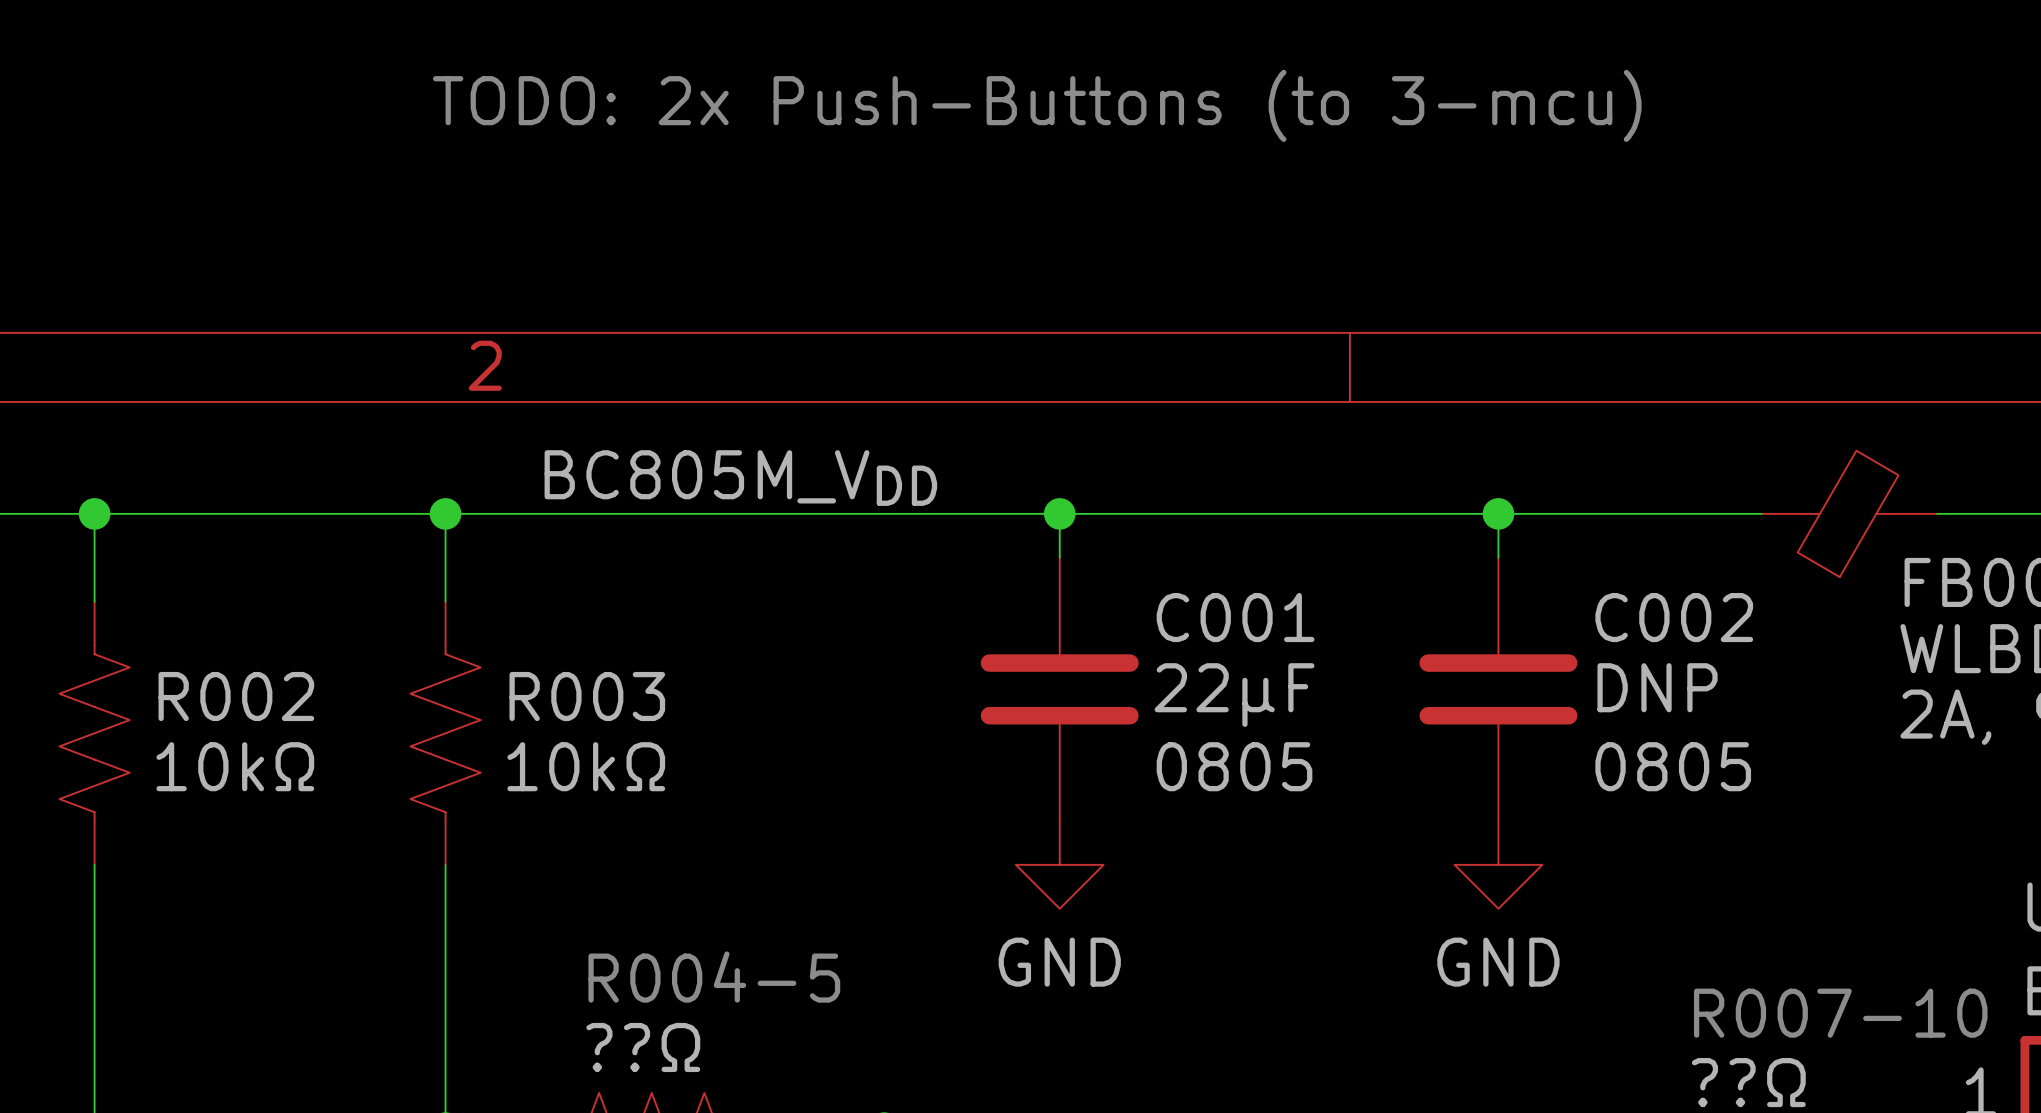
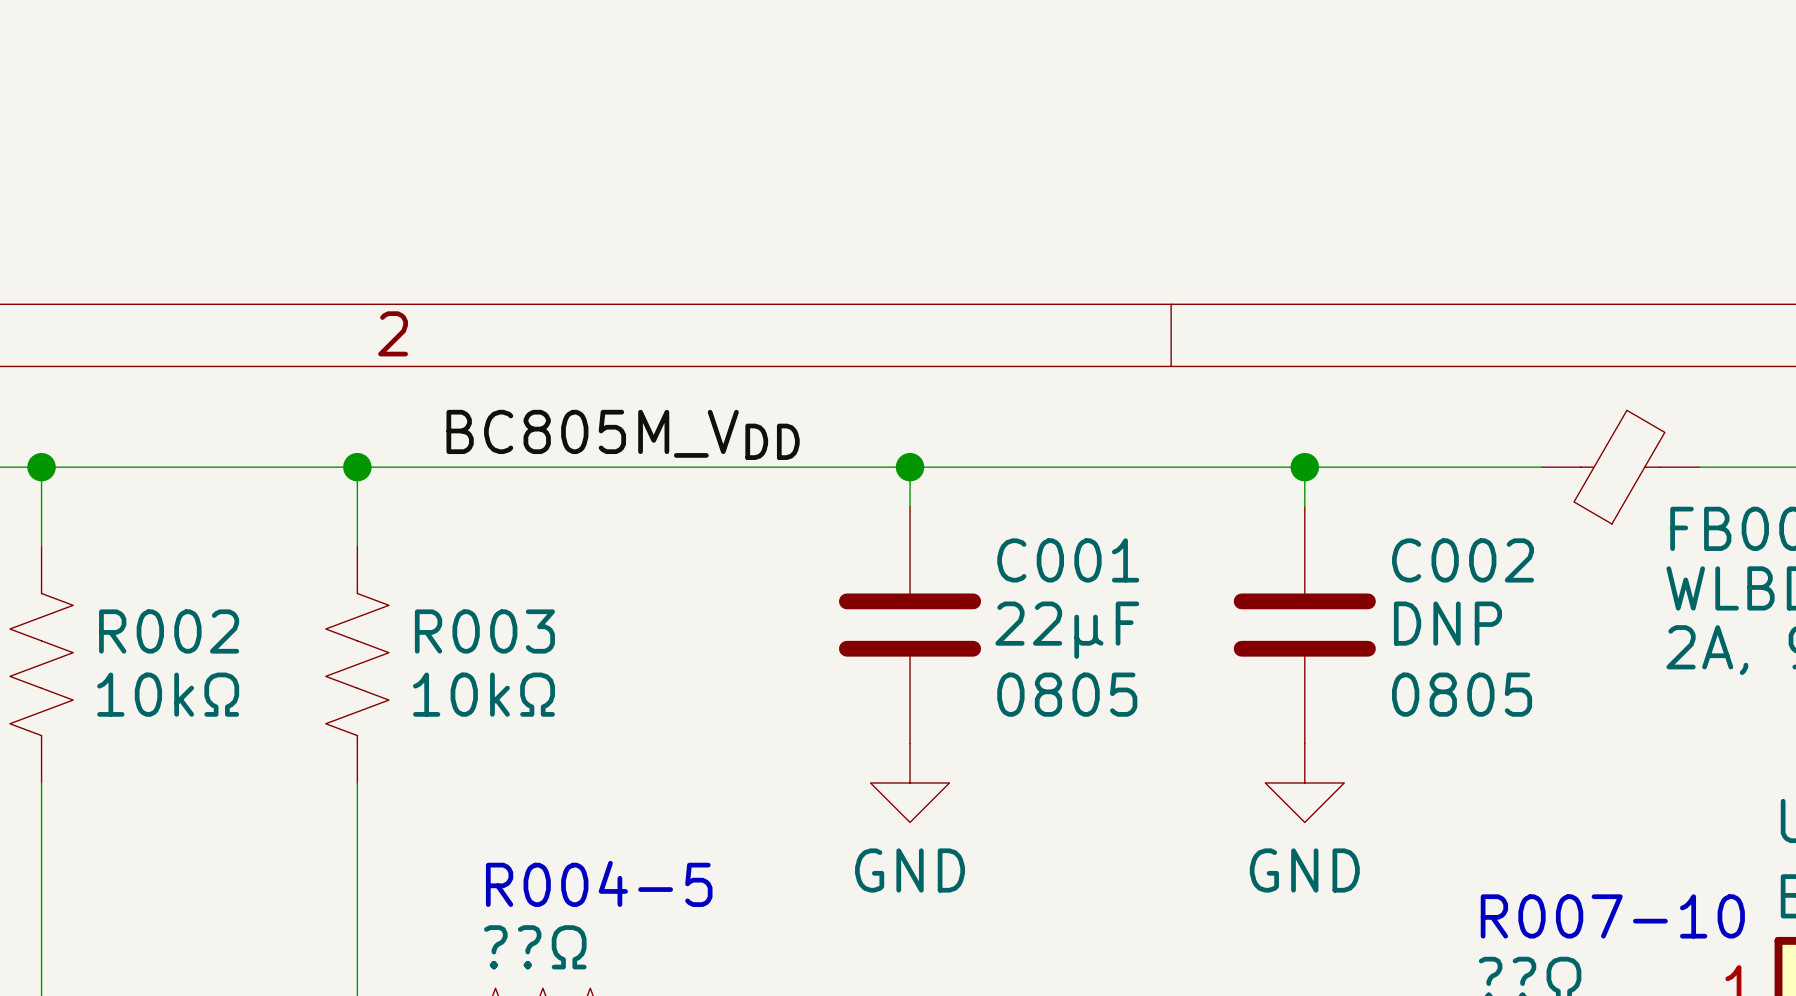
text: TODO: 2x Push-Buttons (to 3-mcu) (1037, 105) -> none

